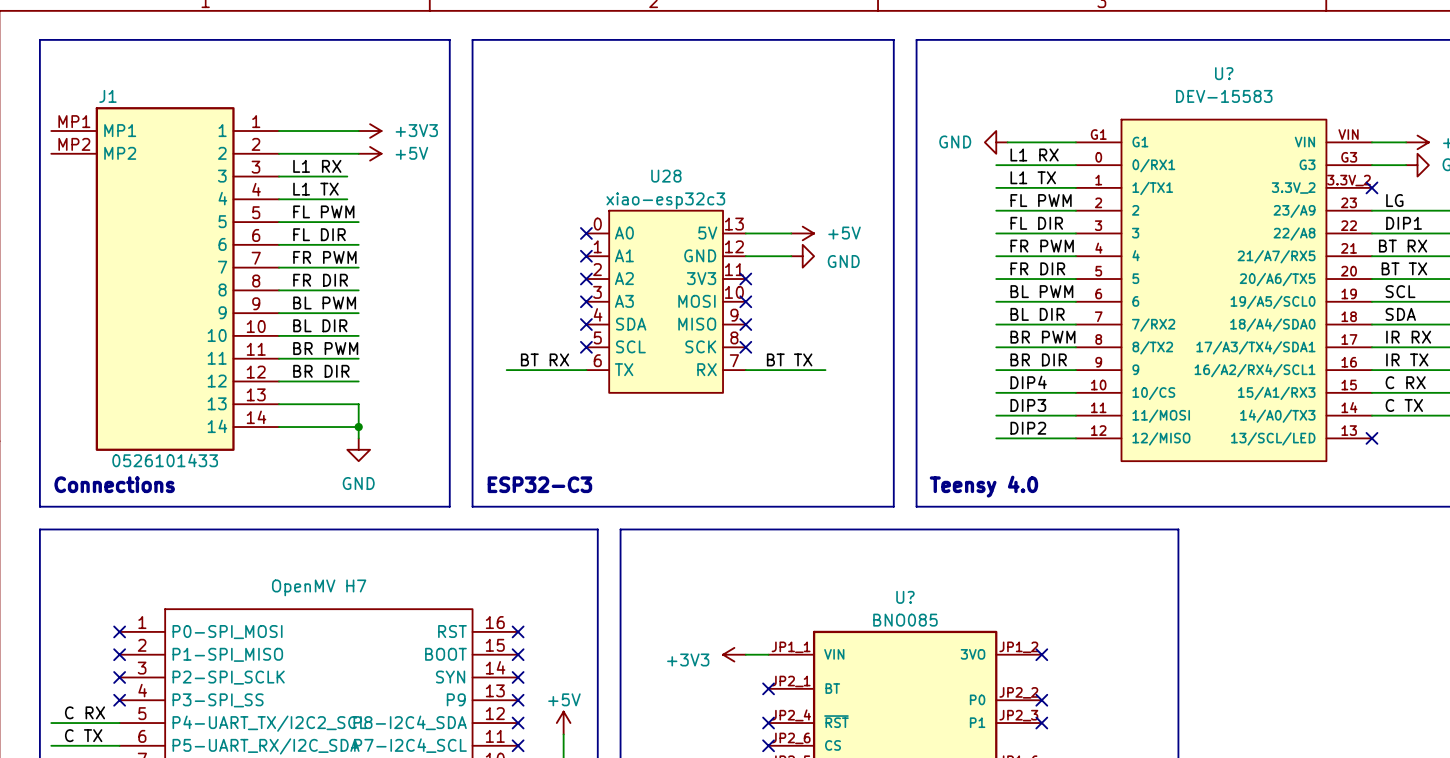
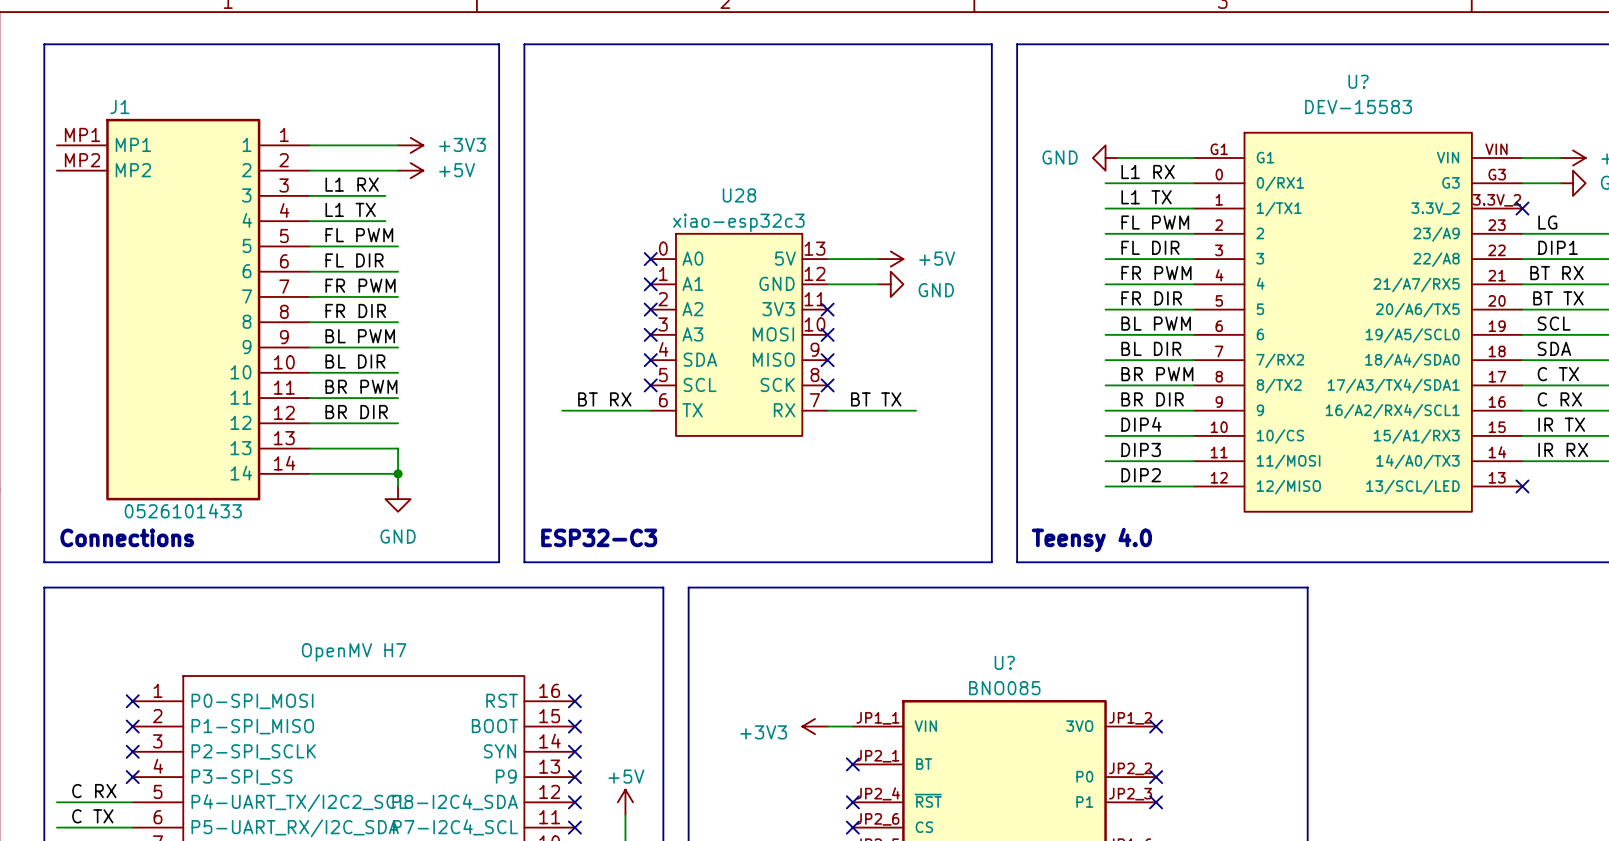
label: IR RX (1408, 337) -> C TX (1558, 374)
label: IR TX (1407, 359) -> C RX (1559, 399)
label: C RX (1405, 382) -> IR TX (1561, 424)
label: C TX (1404, 405) -> IR RX (1563, 449)

